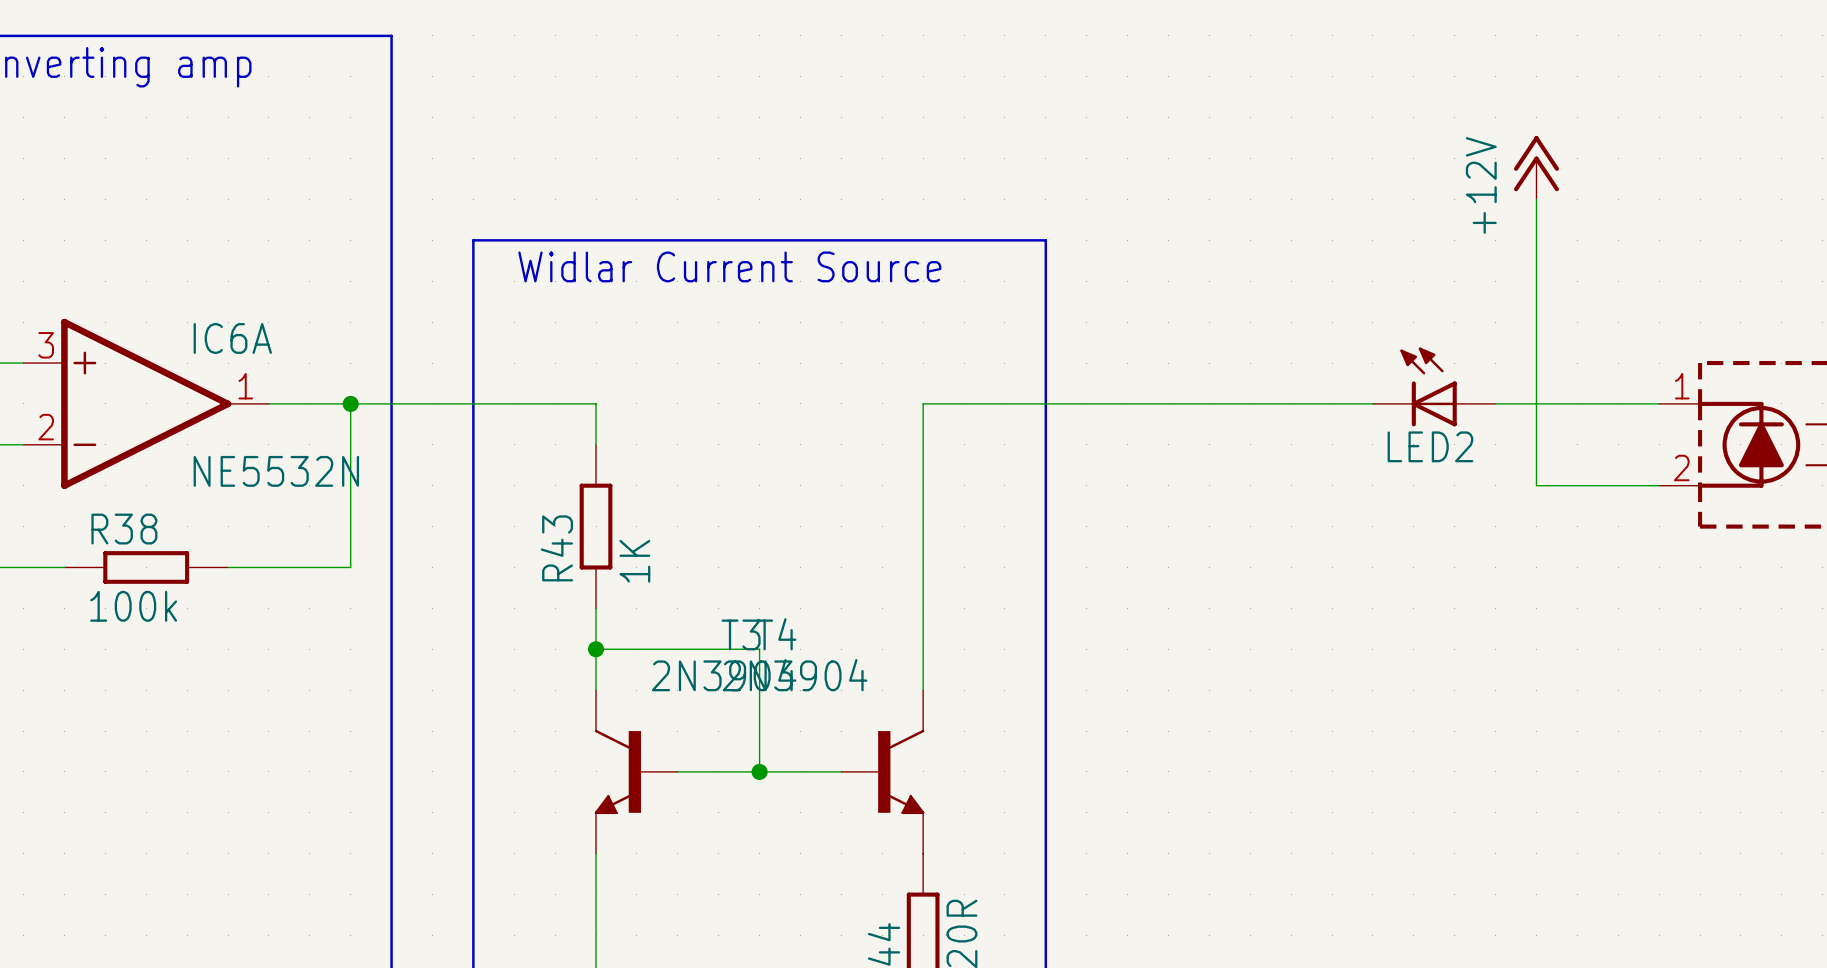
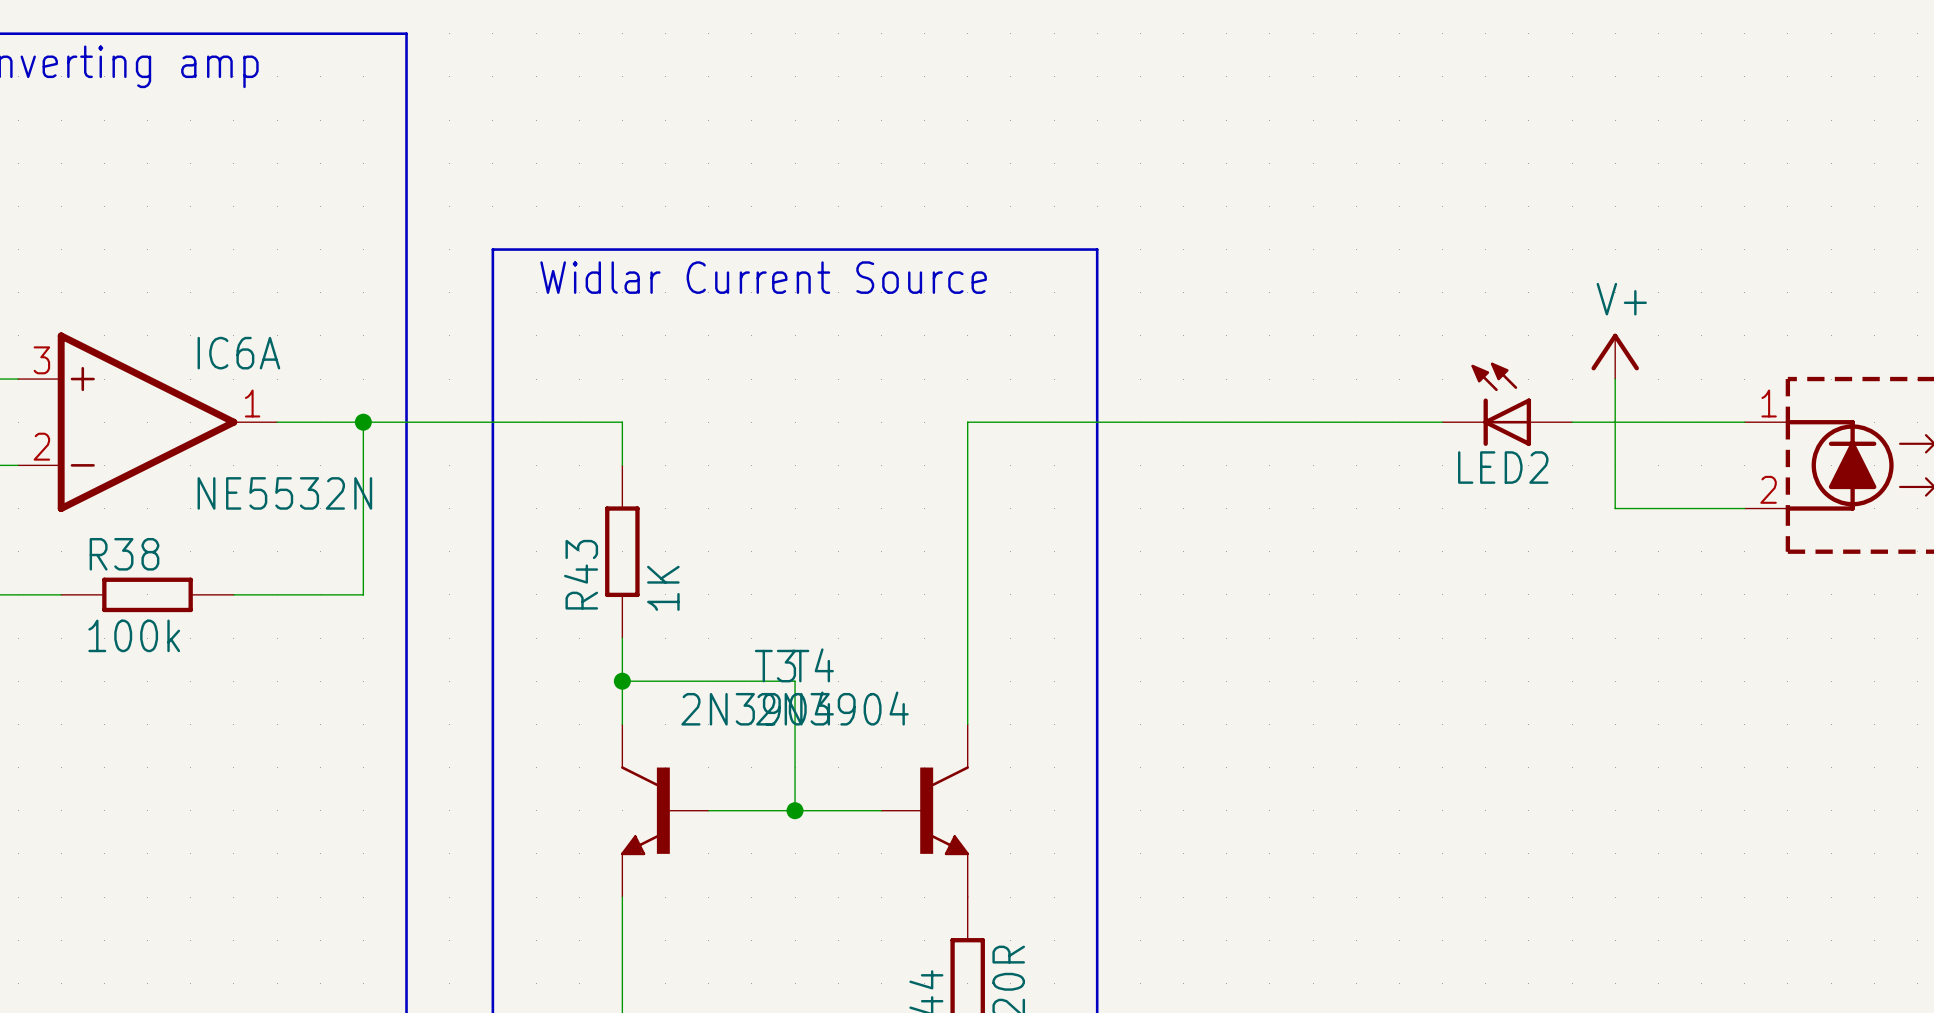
power symbol: +12V (1536, 167) -> none
wire: (1536, 199) (1536, 363) -> none
power symbol: none -> V+ (1615, 356)

